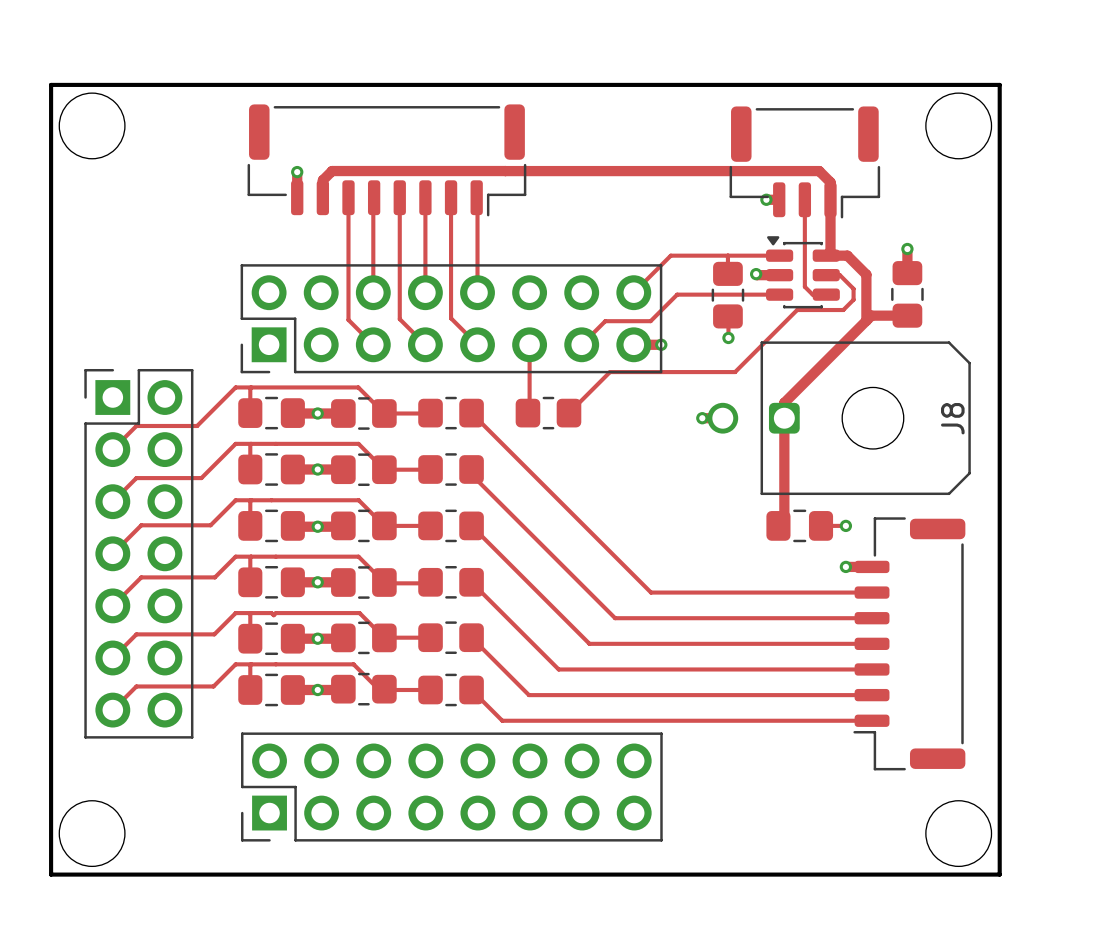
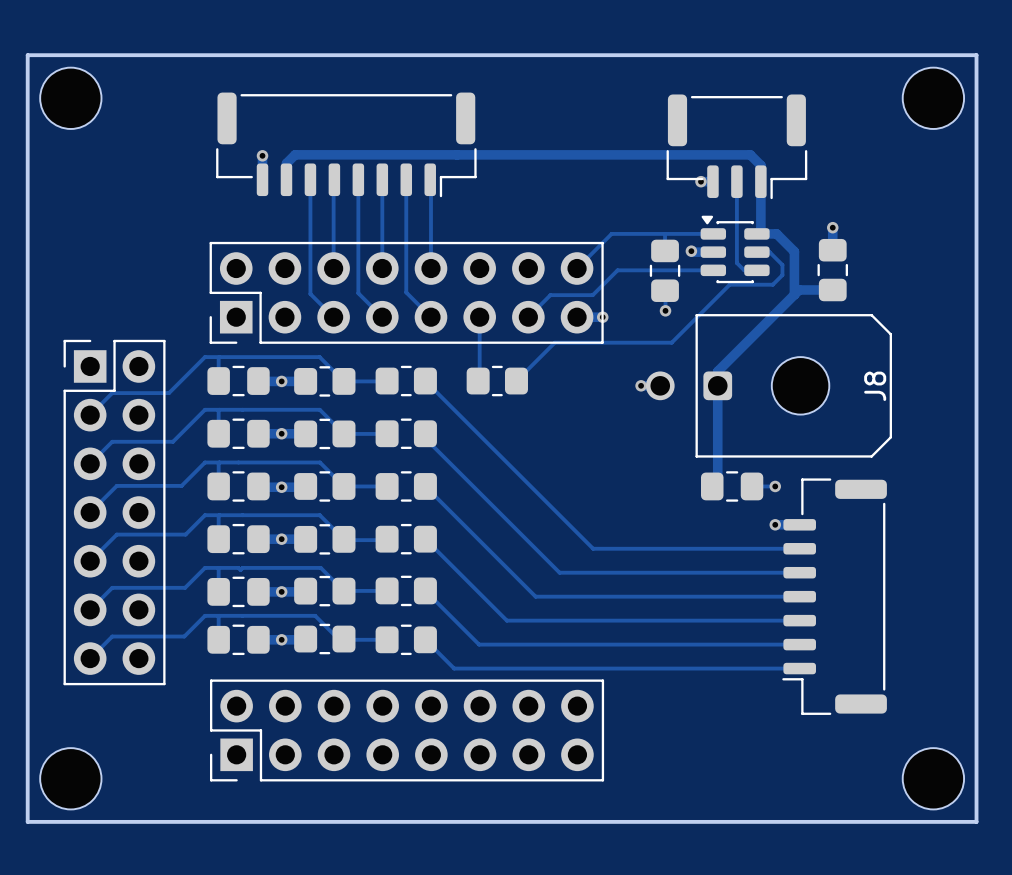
board edge: (51, 84) (999, 84) (999, 874) (51, 874) (51, 84) -> (27, 55) (27, 821) (976, 821) (976, 55) (27, 55)
round board edge: [58, 92, 126, 160] -> none
round board edge: [925, 92, 993, 160] -> none
part: none -> (70, 98)
part: none -> (933, 98)
round board edge: [58, 800, 126, 867] -> none
round board edge: [925, 800, 993, 867] -> none
part: none -> (70, 778)
part: none -> (933, 778)

